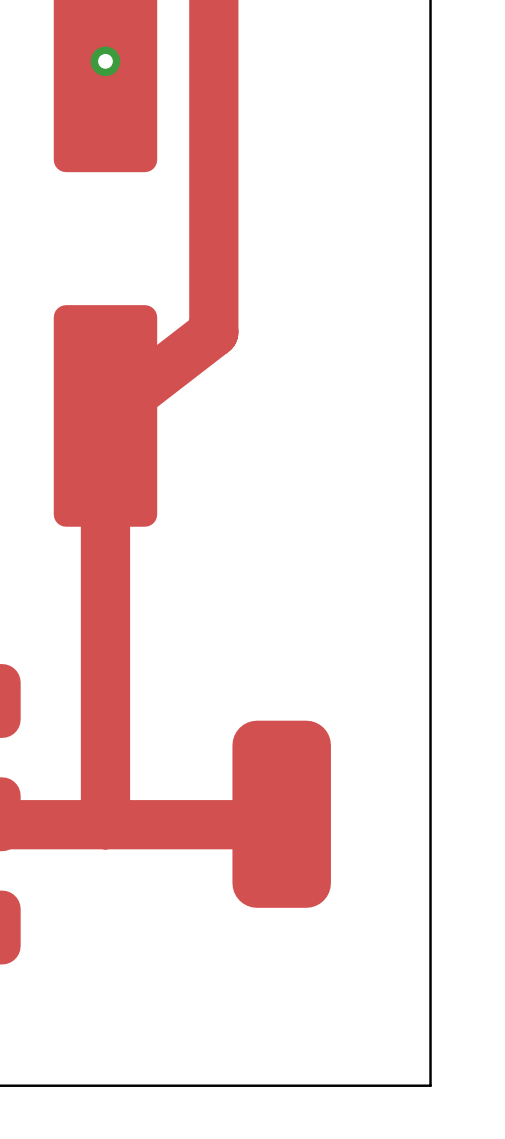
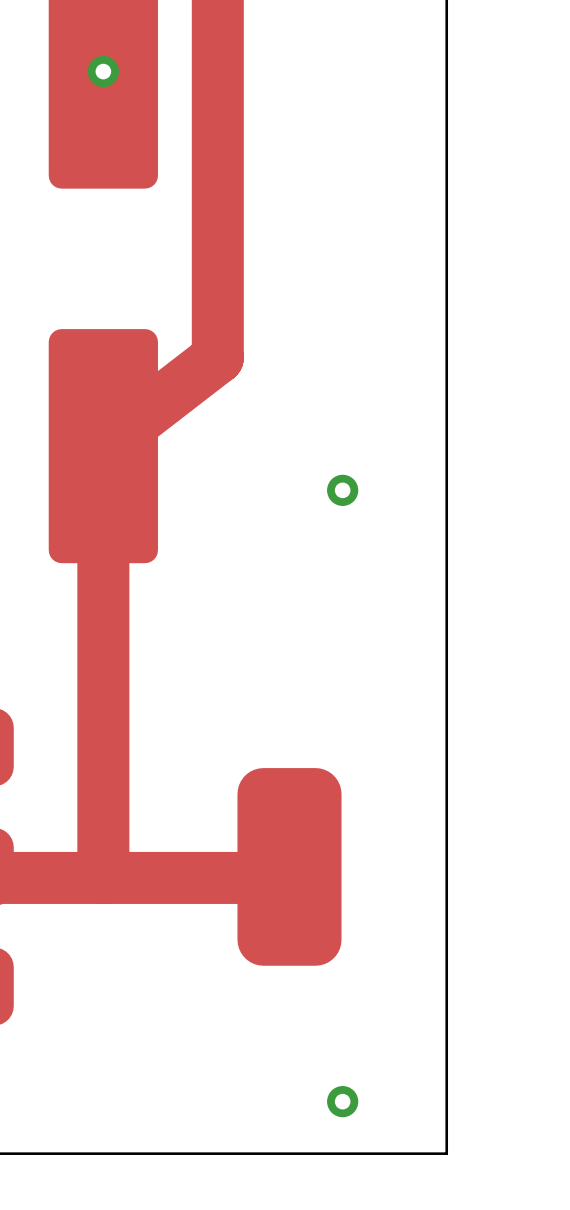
via: none -> (342, 490)
via: none -> (342, 1101)

